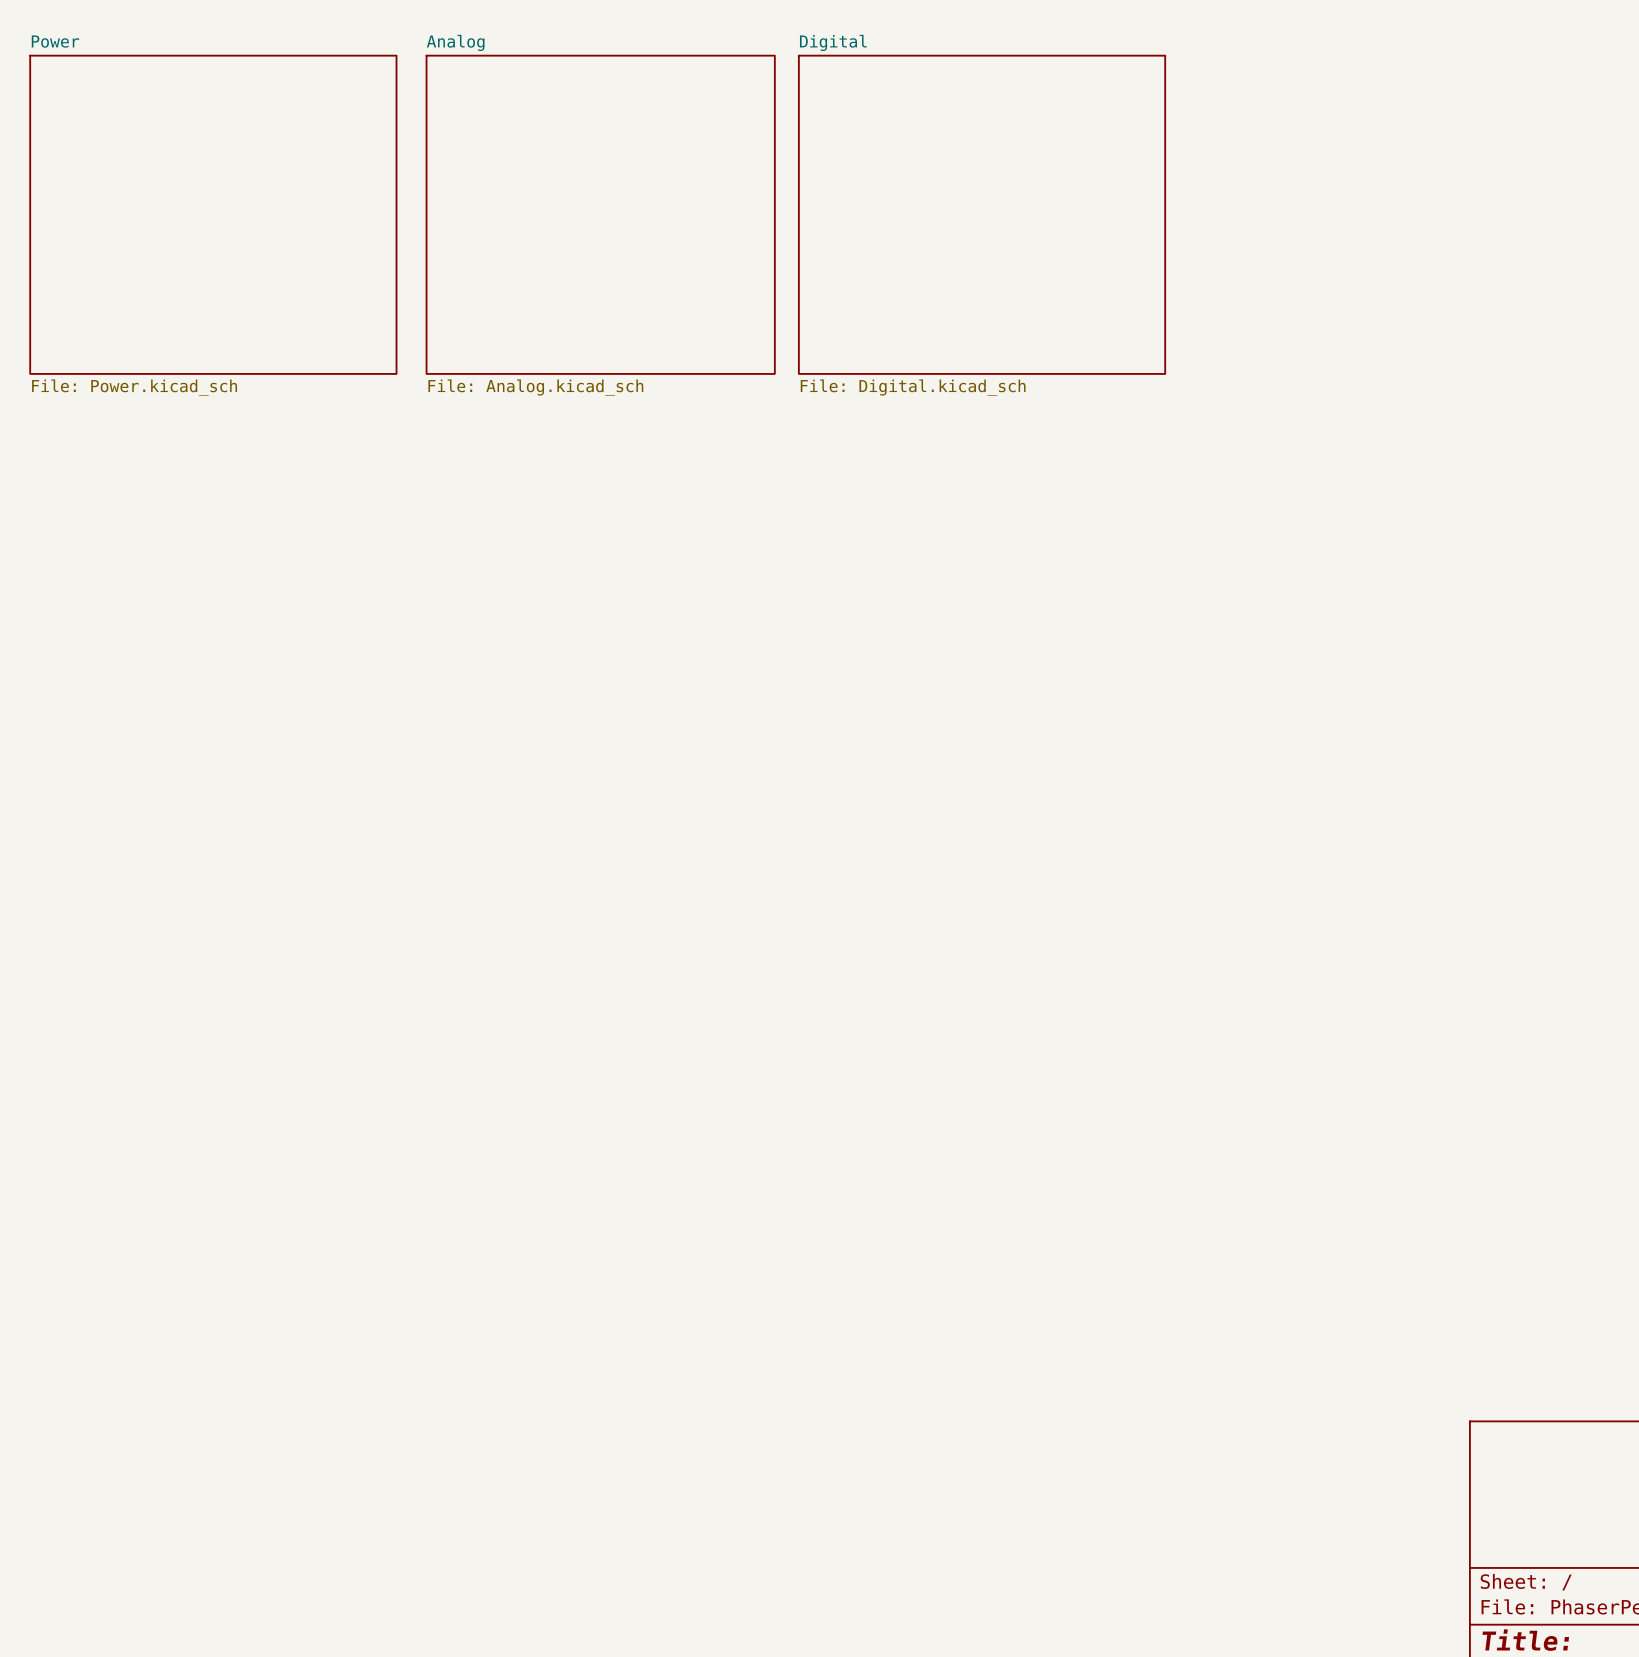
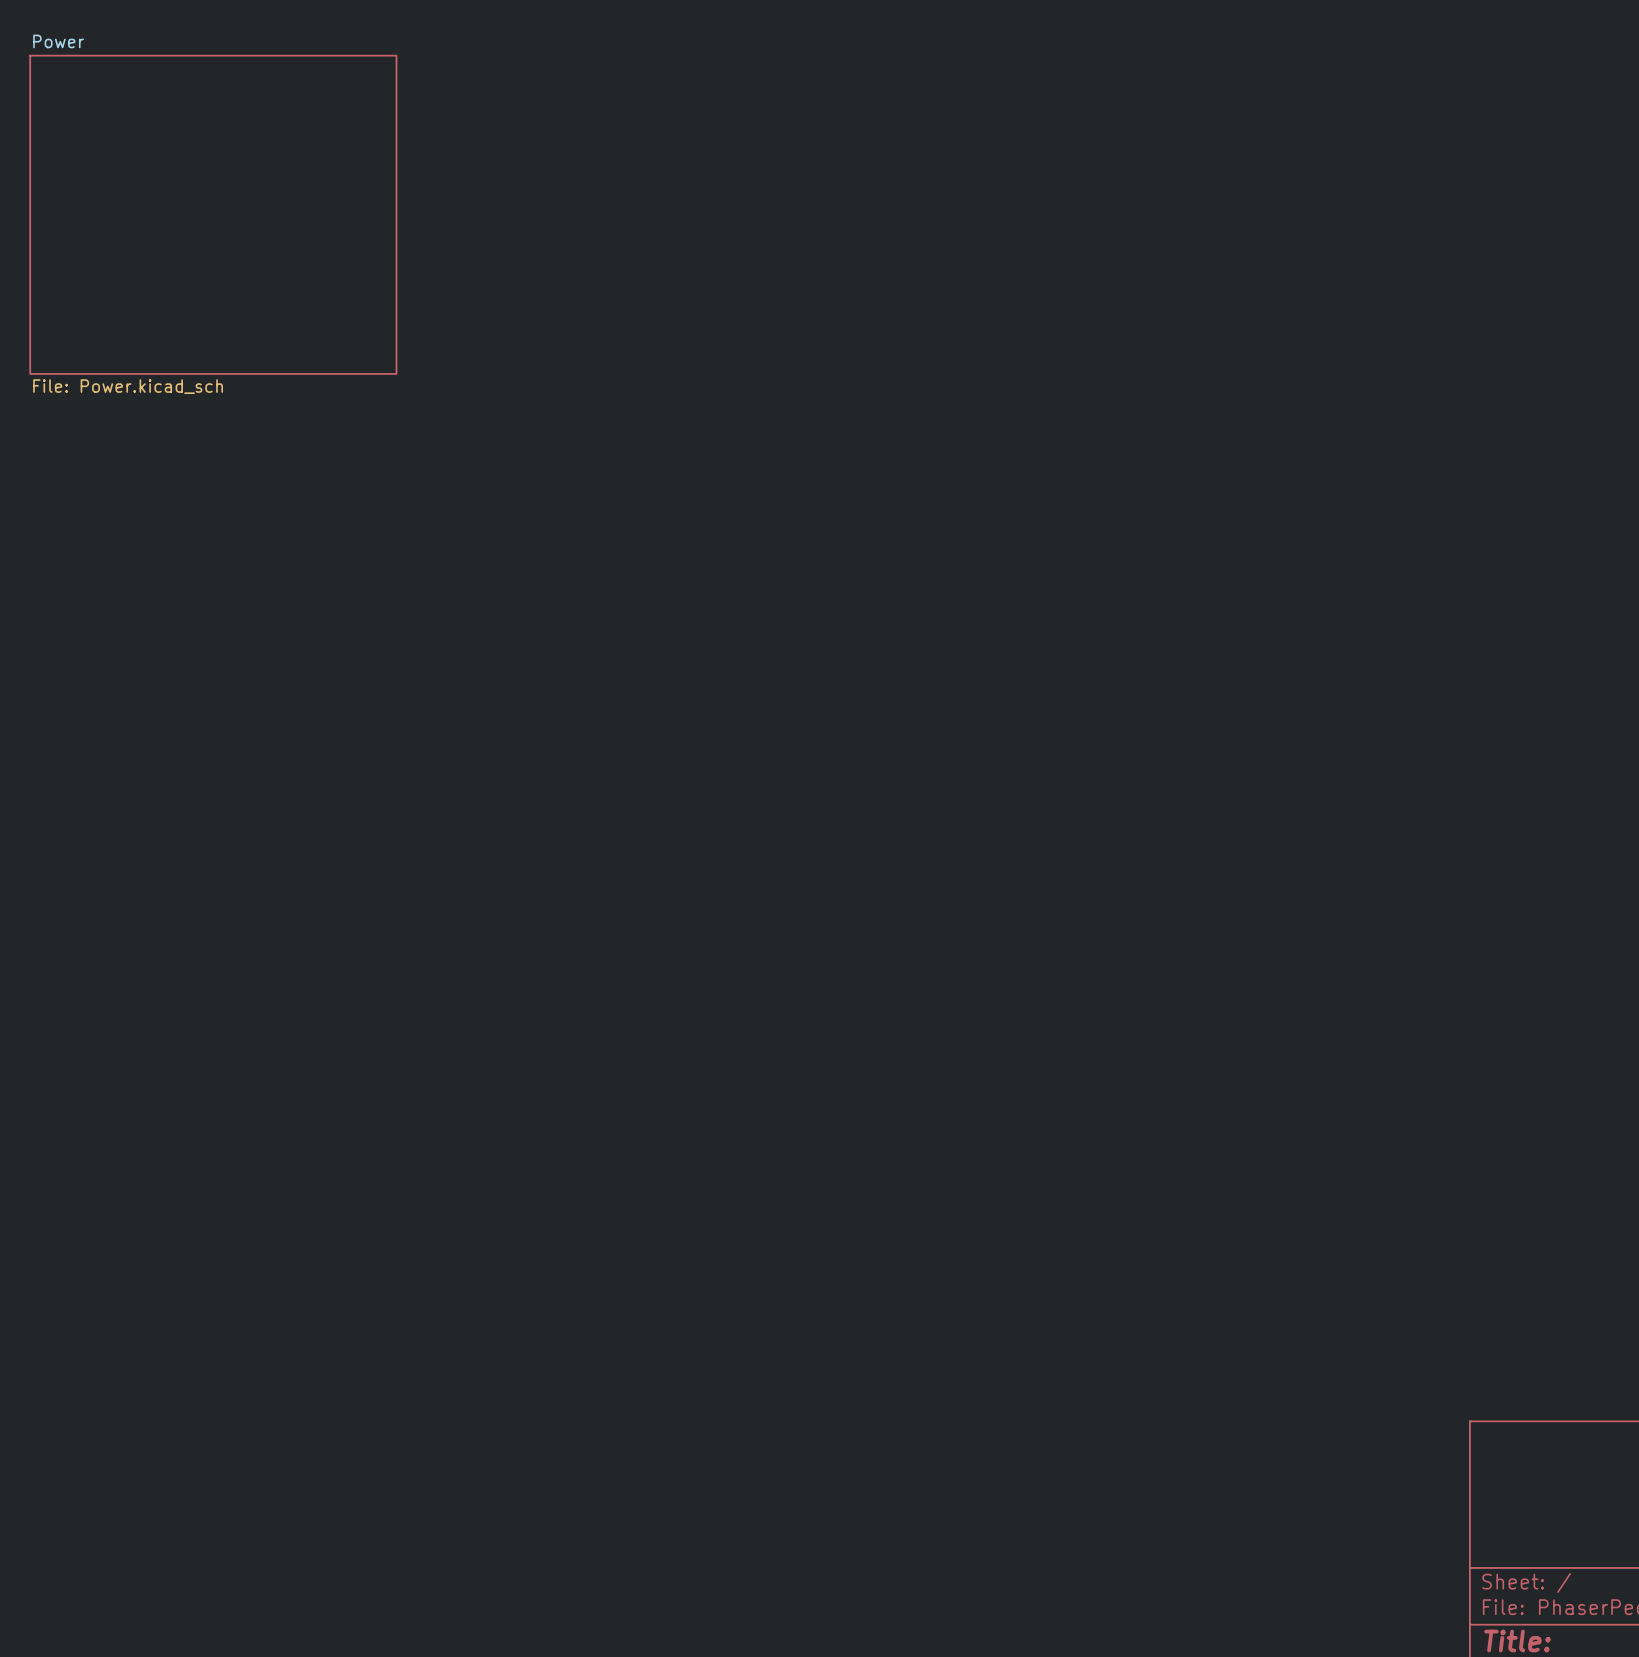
sheet Analog: File: Analog.kicad_sch (600, 214) -> none
sheet Digital: File: Digital.kicad_sch (982, 214) -> none

